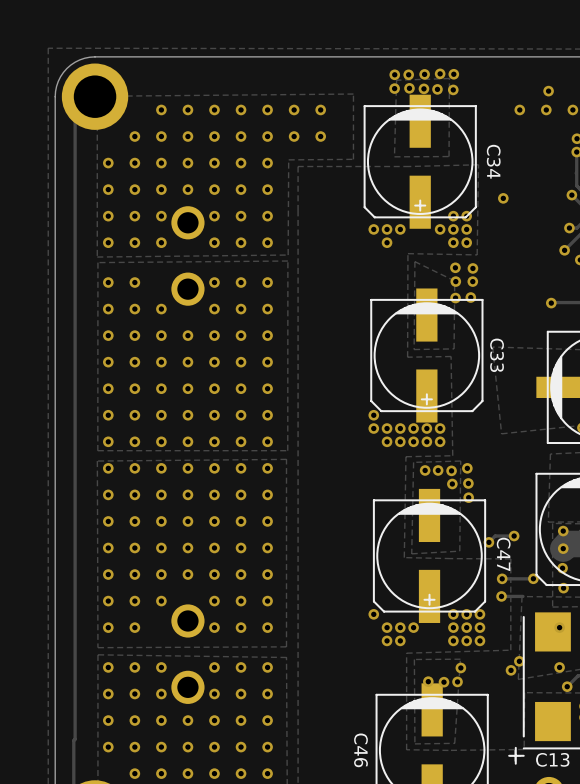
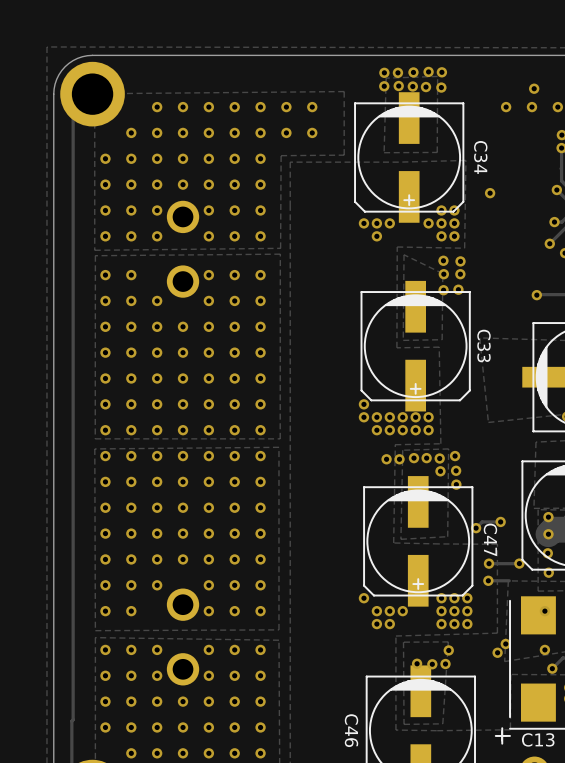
via: none -> (386, 459)
via: none -> (399, 459)

